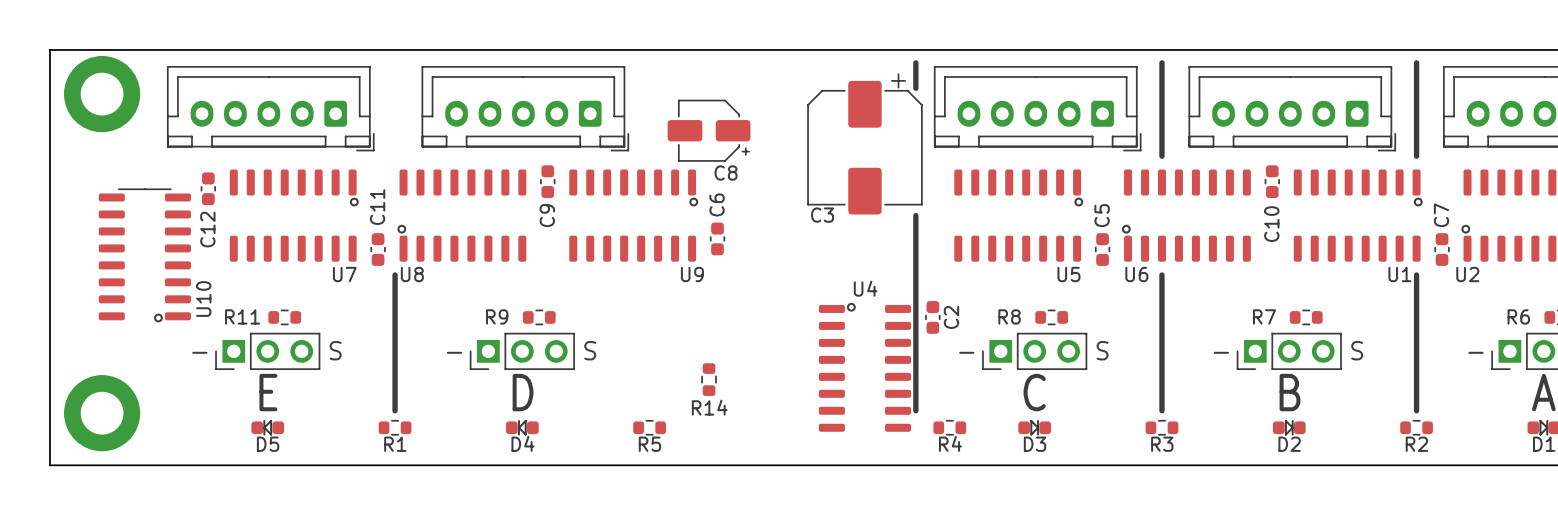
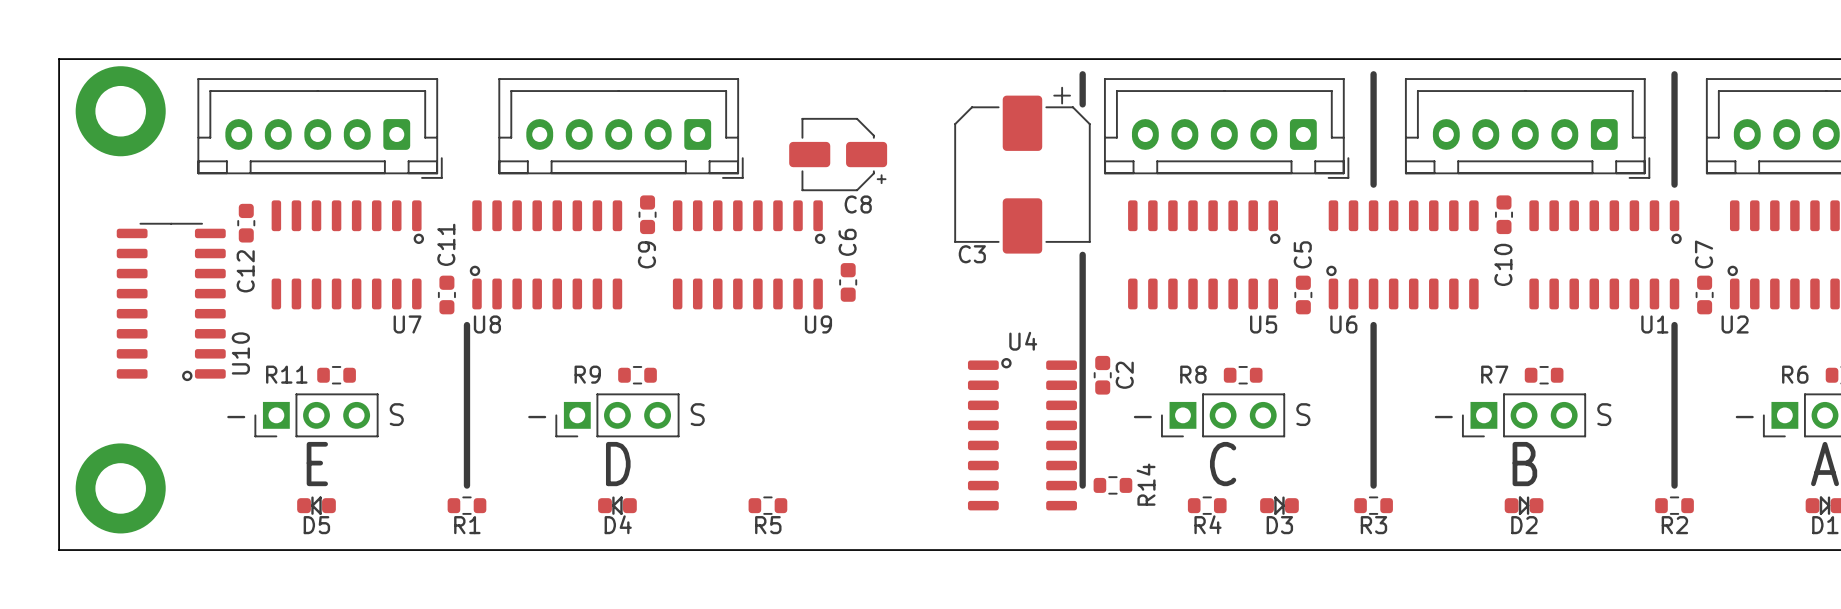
R14 rotation: 0° (709, 379) -> 90° clockwise (1112, 485)
R14 position: (709, 379) -> (1112, 485)
R14 name position: R14 (709, 407) -> R14 (1146, 484)
R4 position: (949, 427) -> (1207, 505)
D3 position: (1034, 427) -> (1279, 505)

